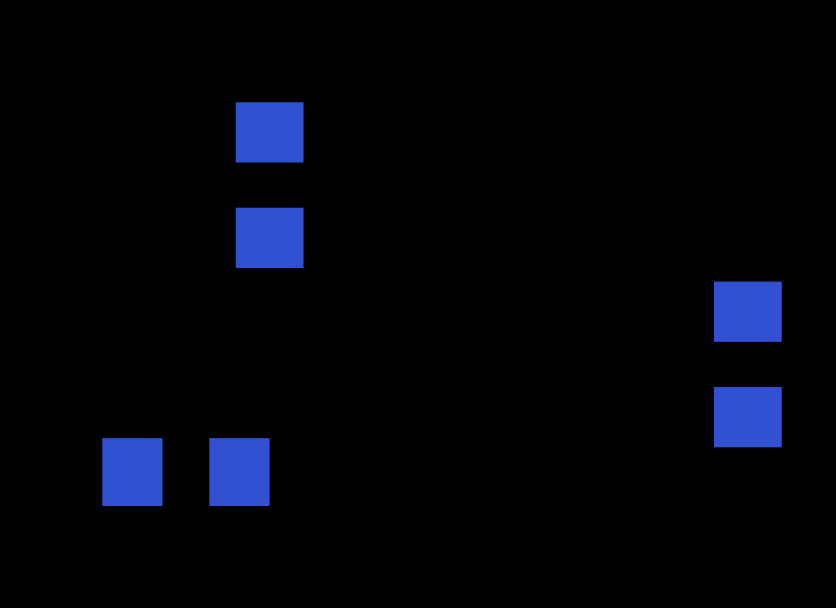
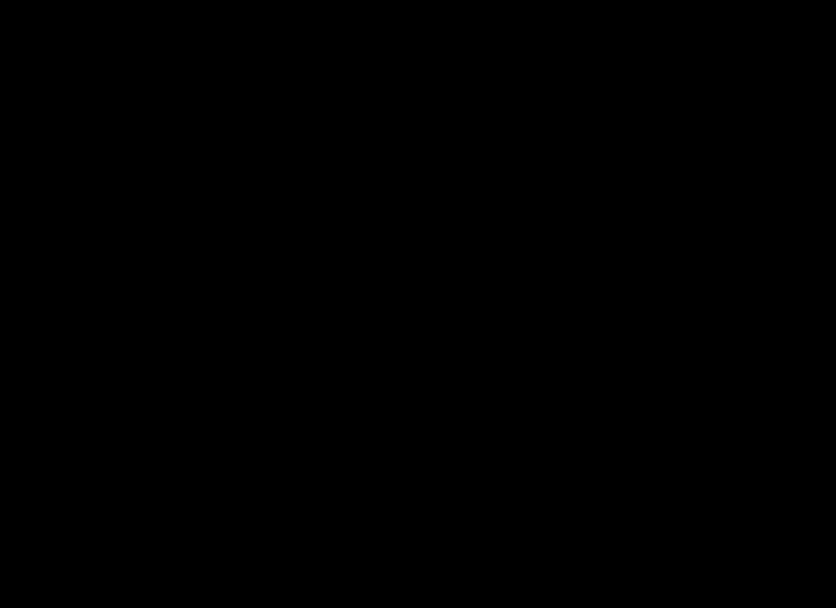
part: (269, 185) -> none
part: (747, 364) -> none
part: (185, 472) -> none

